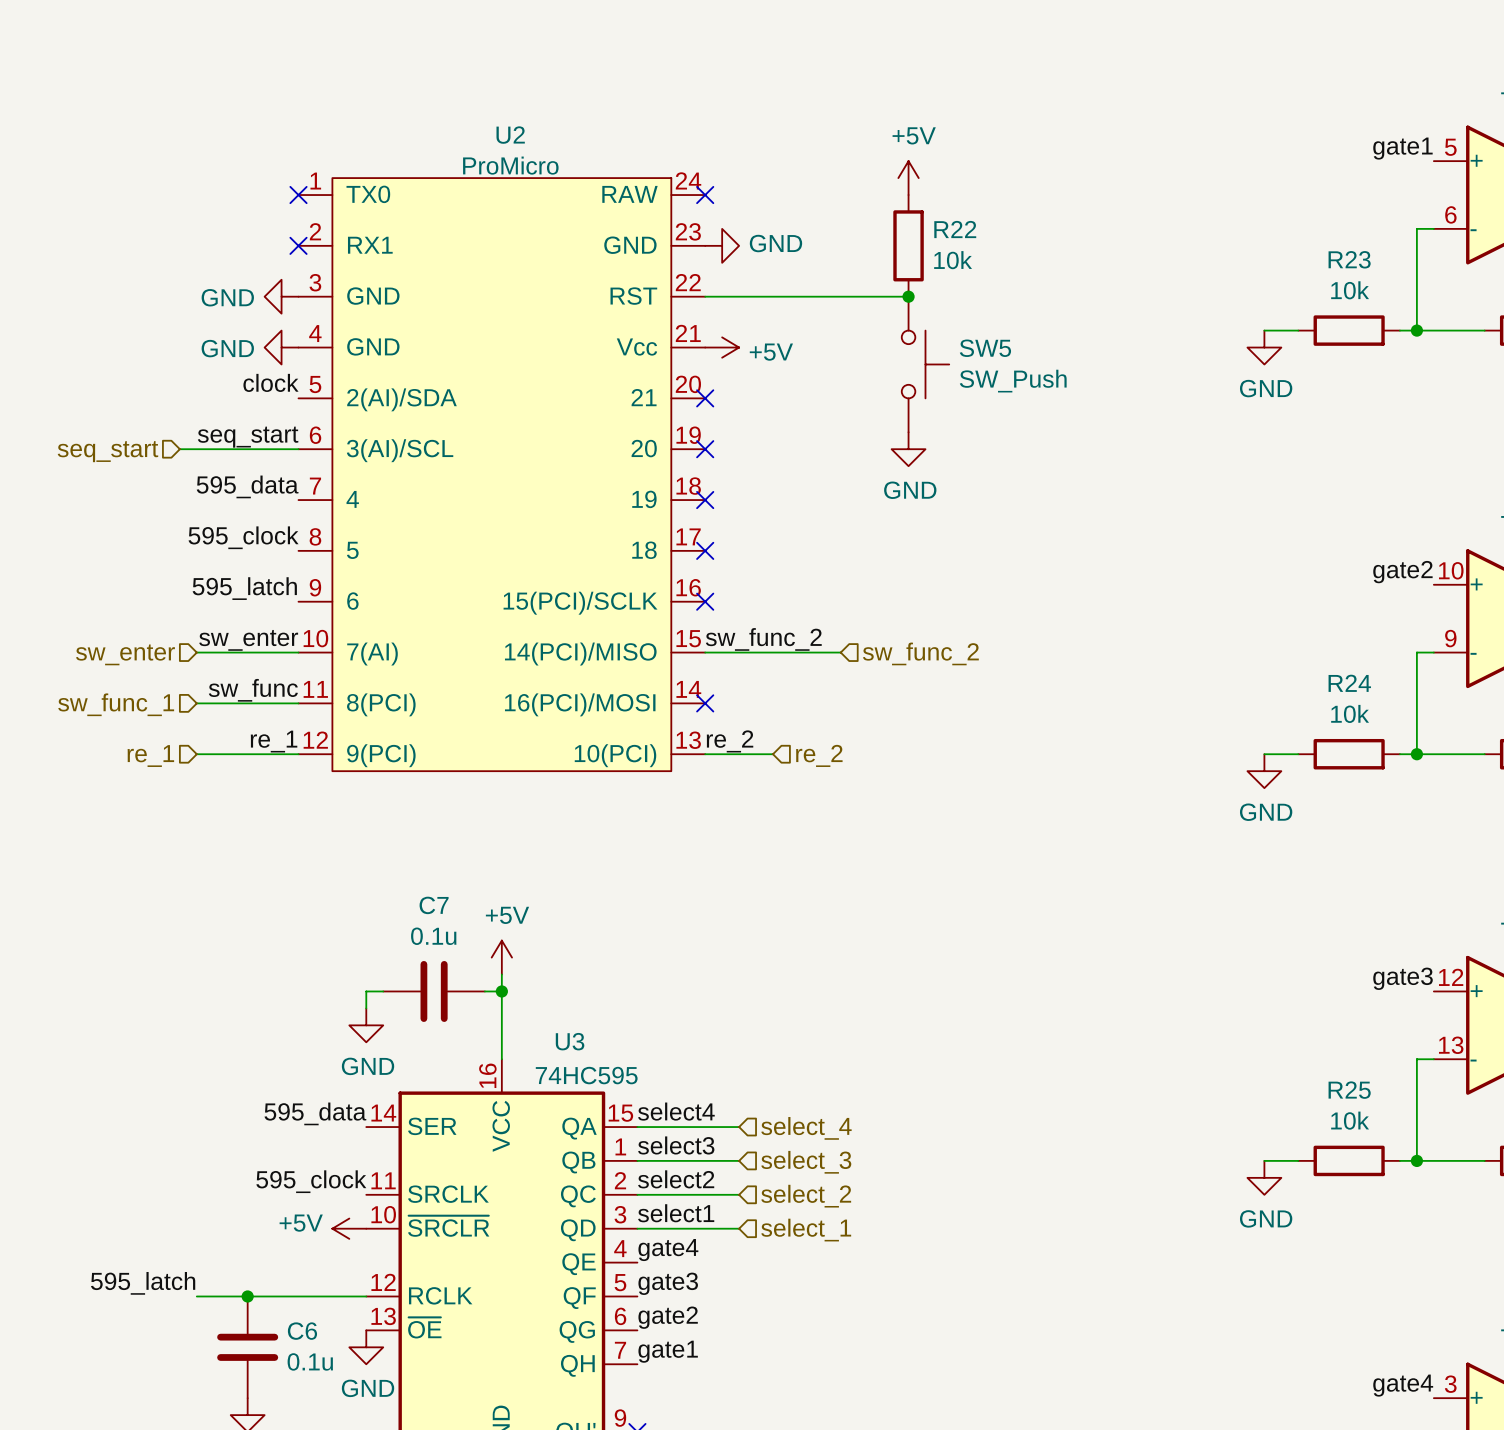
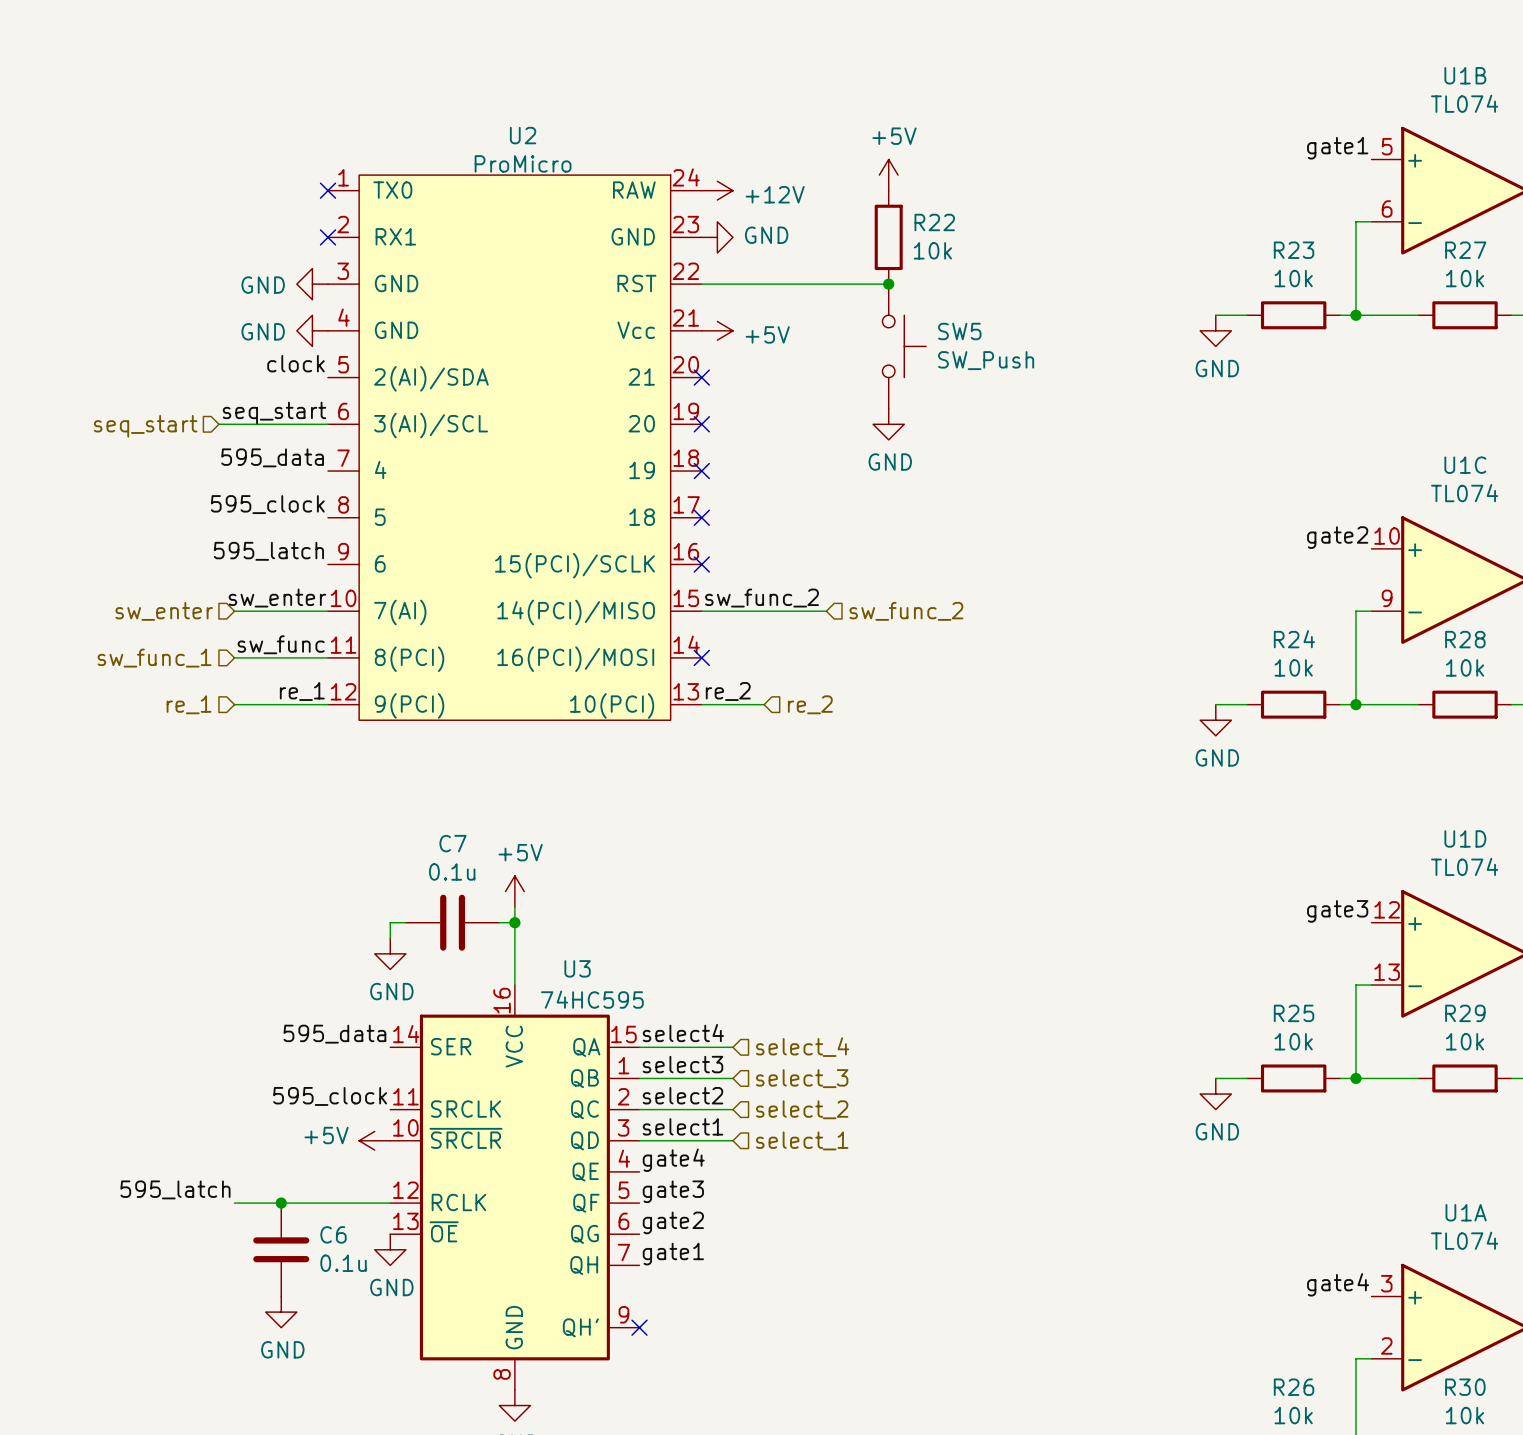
no-connect mark: (705, 195) -> none
power symbol: none -> +12V (717, 190)

